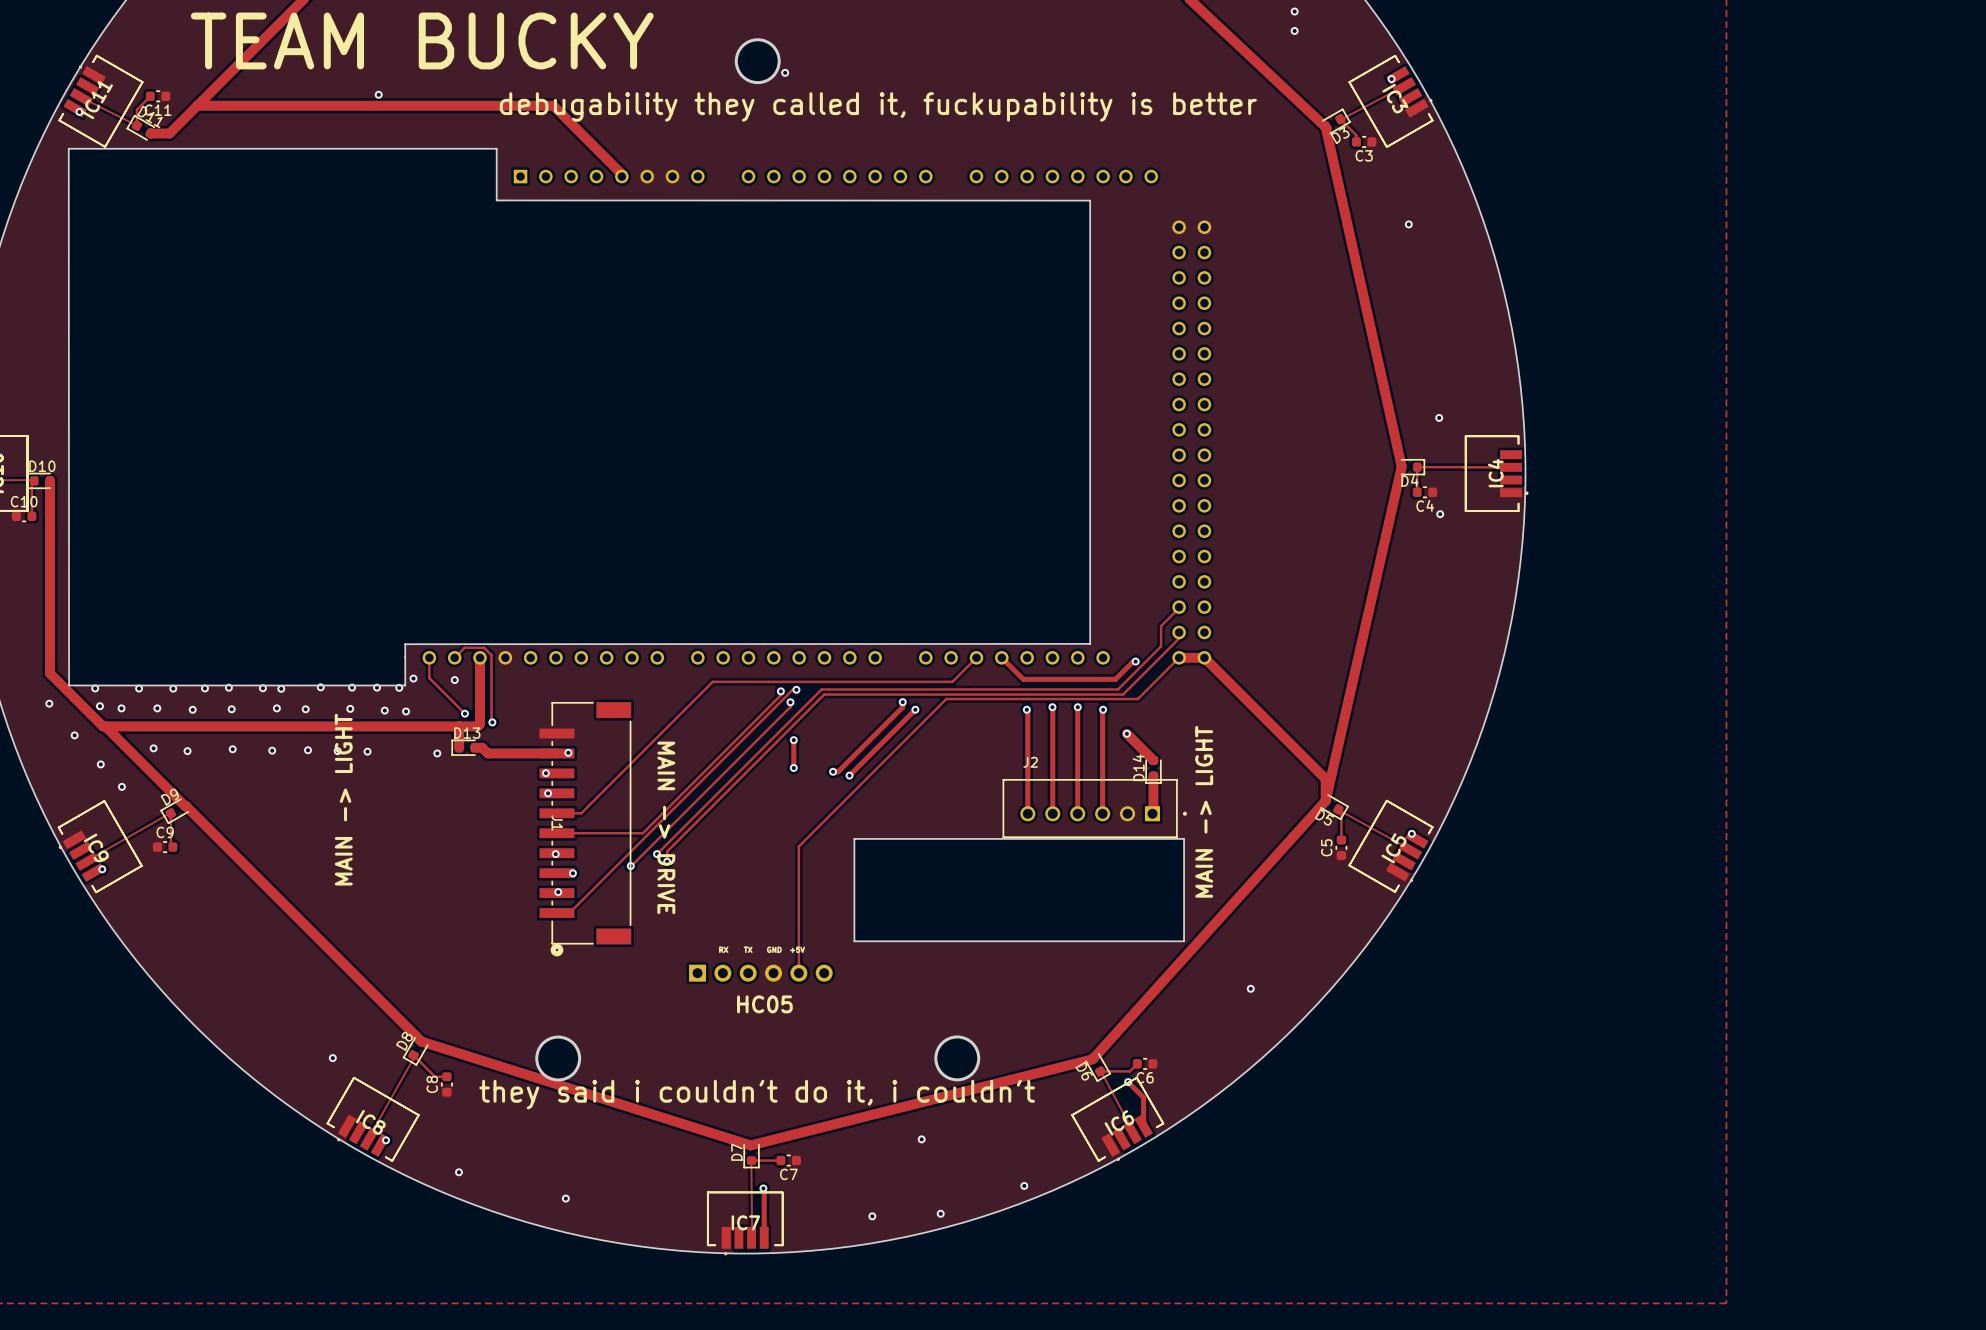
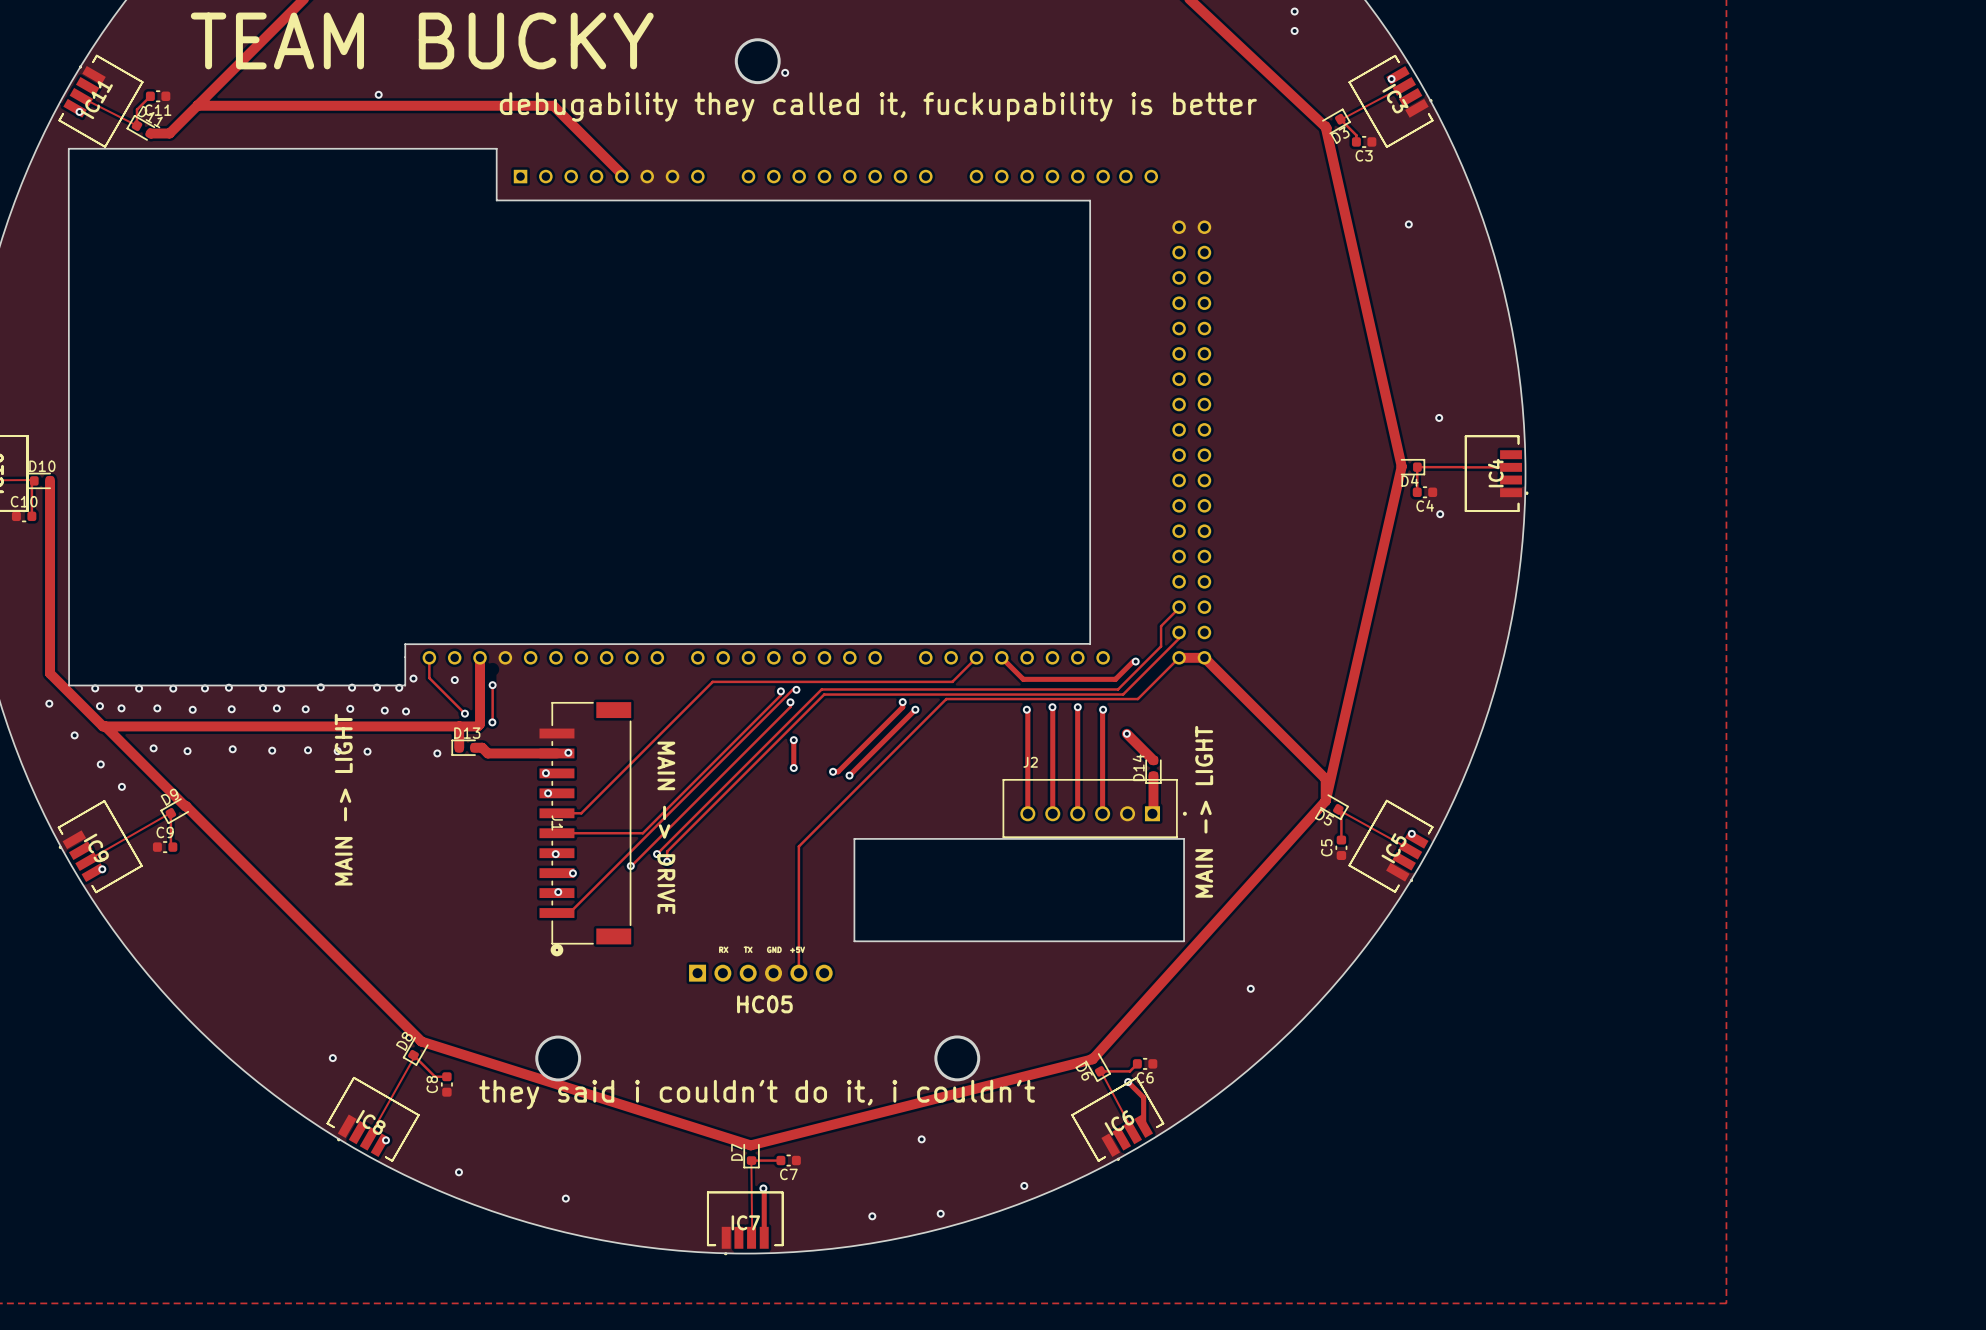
track: (454, 657) (464, 647) (484, 647) (491, 655) (492, 722) -> (492, 685) (492, 722)
via: none -> (492, 685)

